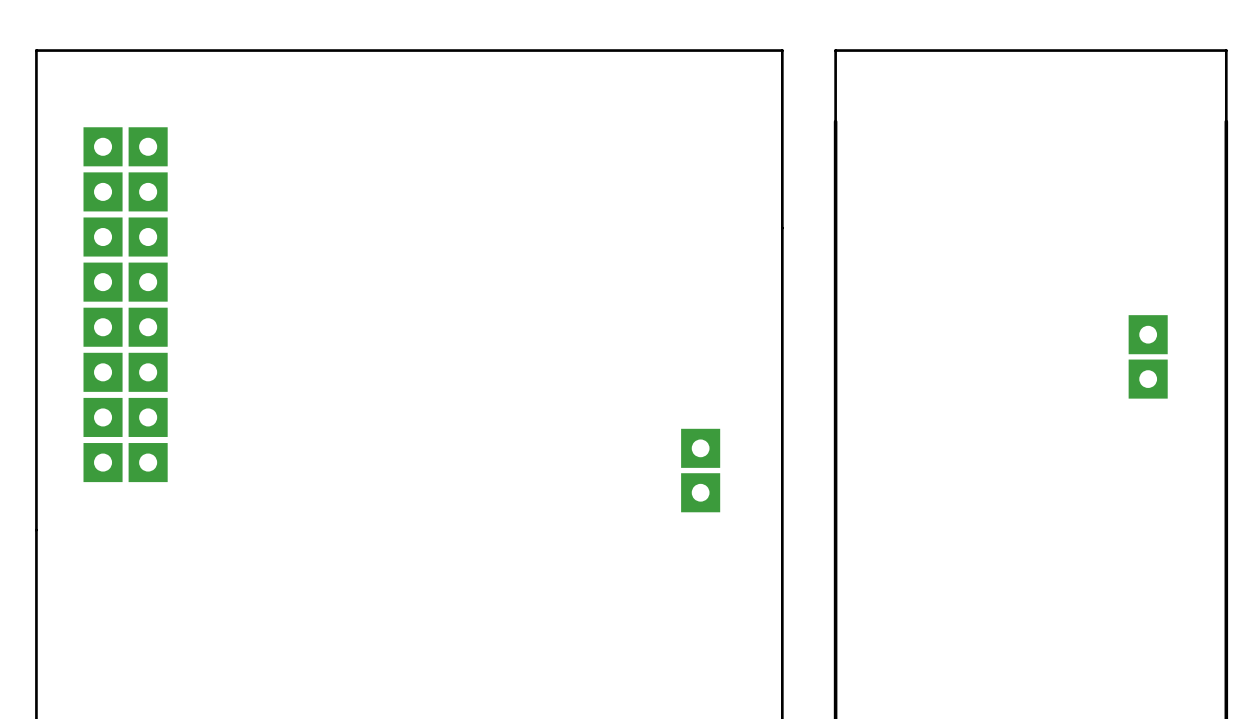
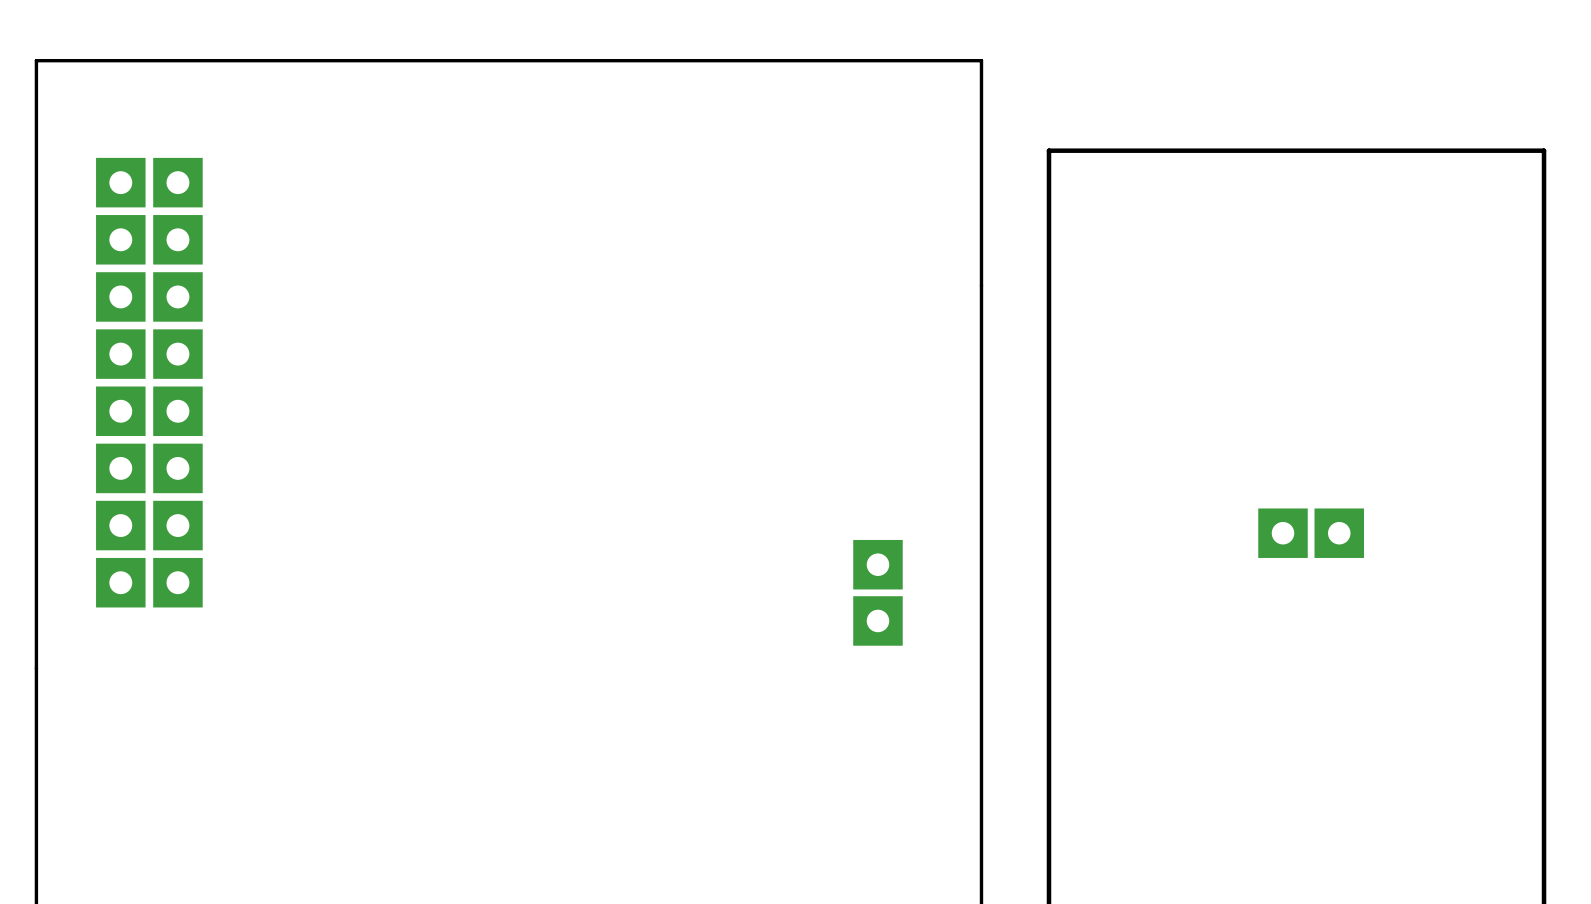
board edge: (1226, 121) (1226, 50) (835, 50) (835, 121) -> (1544, 150) (1048, 150)
part rotation: 0° (1148, 356) -> 90° clockwise (1311, 533)
part position: (1148, 356) -> (1311, 533)

